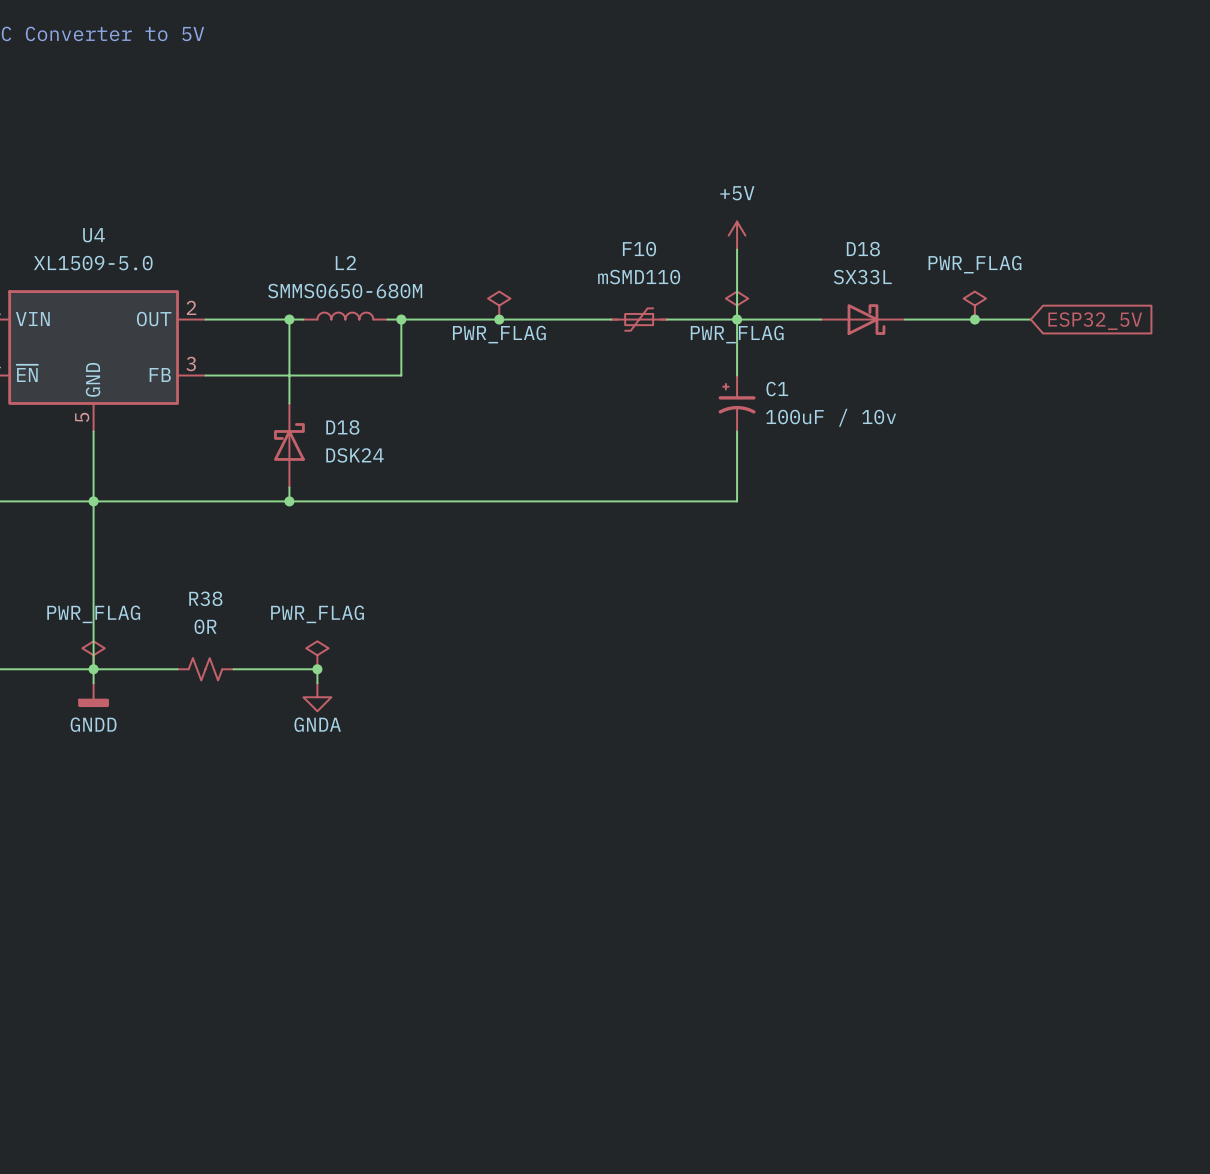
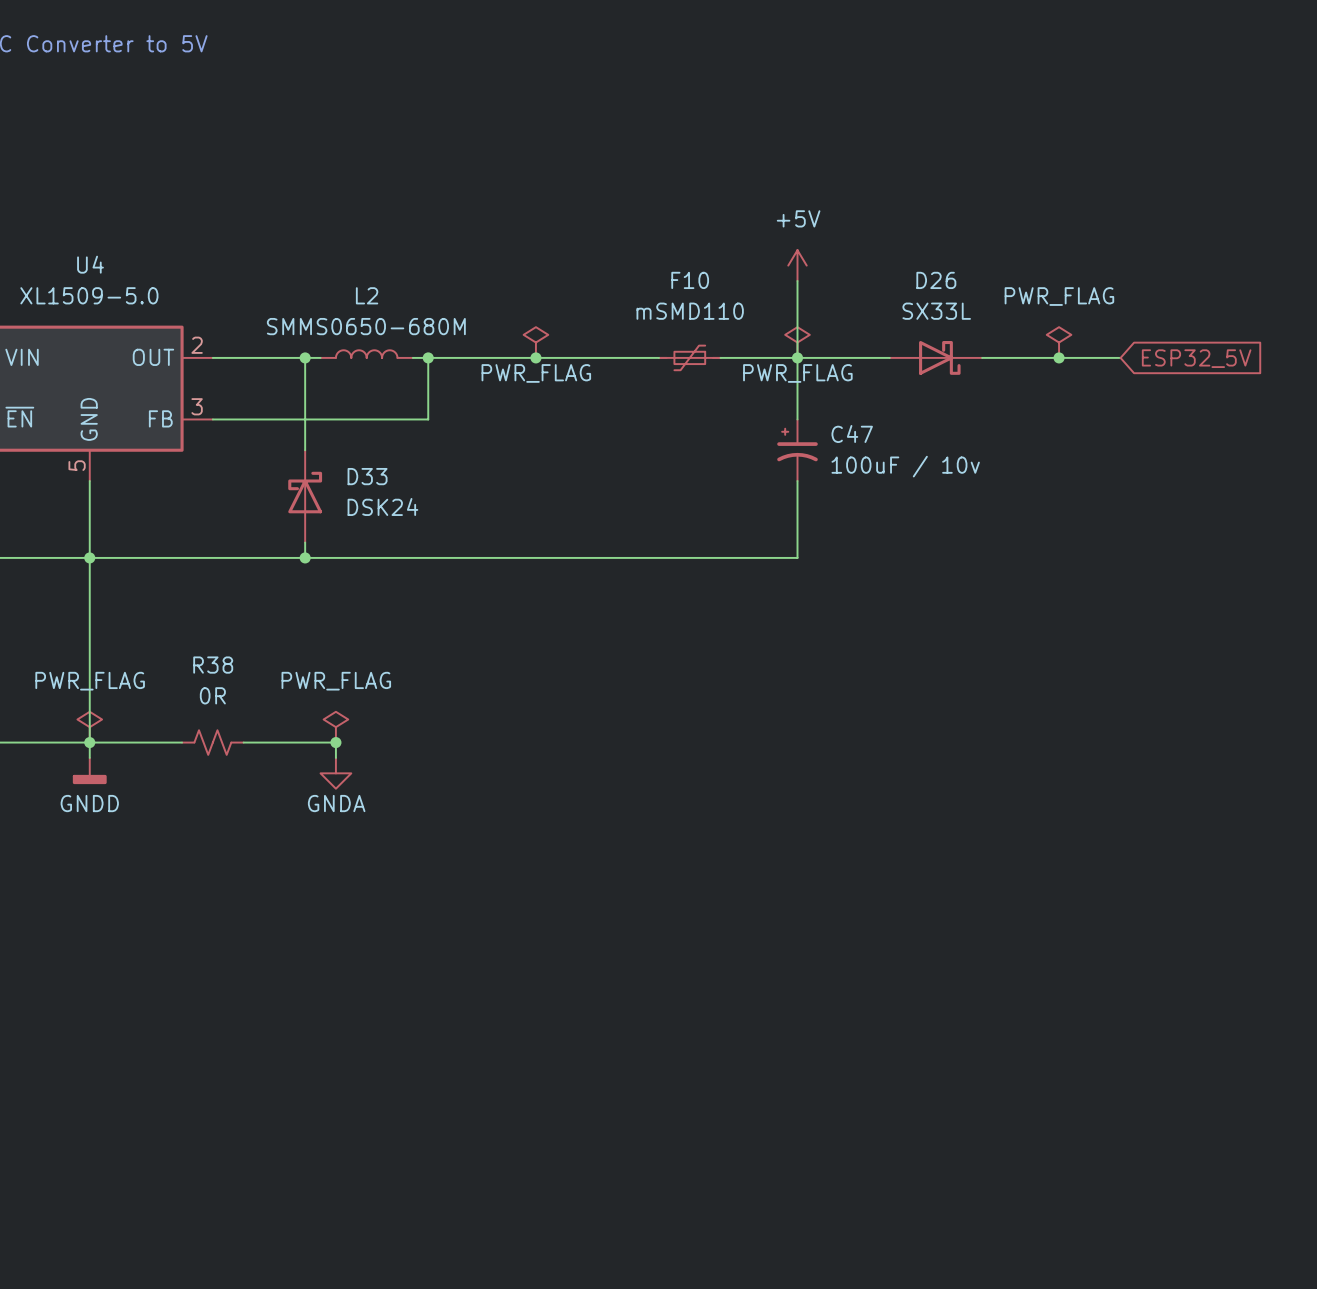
D18 name: D18 (863, 249) -> D26 (936, 280)
C1 name: C1 (777, 389) -> C47 (852, 433)
D18 name: D18 (342, 427) -> D33 (367, 476)

